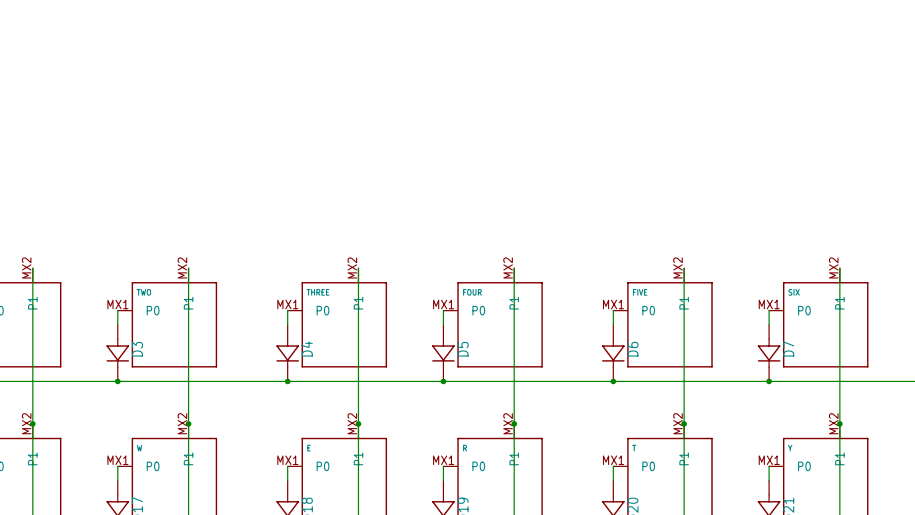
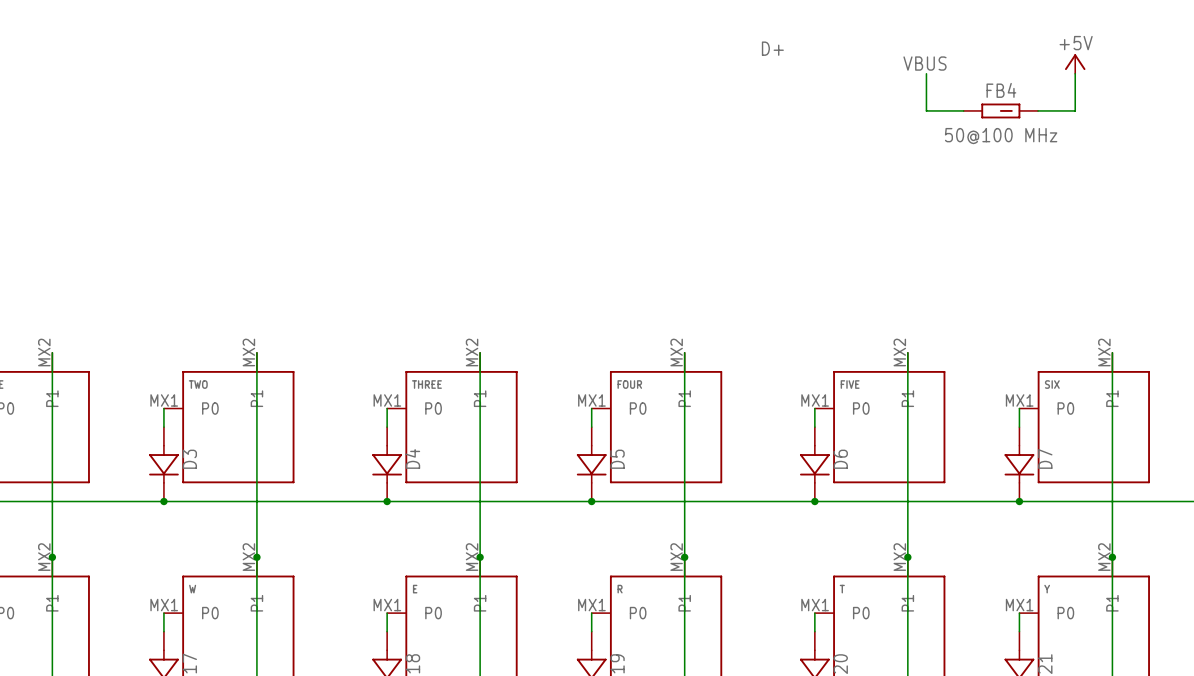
label: none -> D+ (772, 48)
label: none -> VBUS (924, 63)
power symbol: none -> +5V (1075, 64)
wire: none -> (926, 73) (926, 110) (963, 110)
wire: none -> (1075, 73) (1075, 110) (1038, 110)
FB4: none -> 50@100 MHz (1000, 110)

